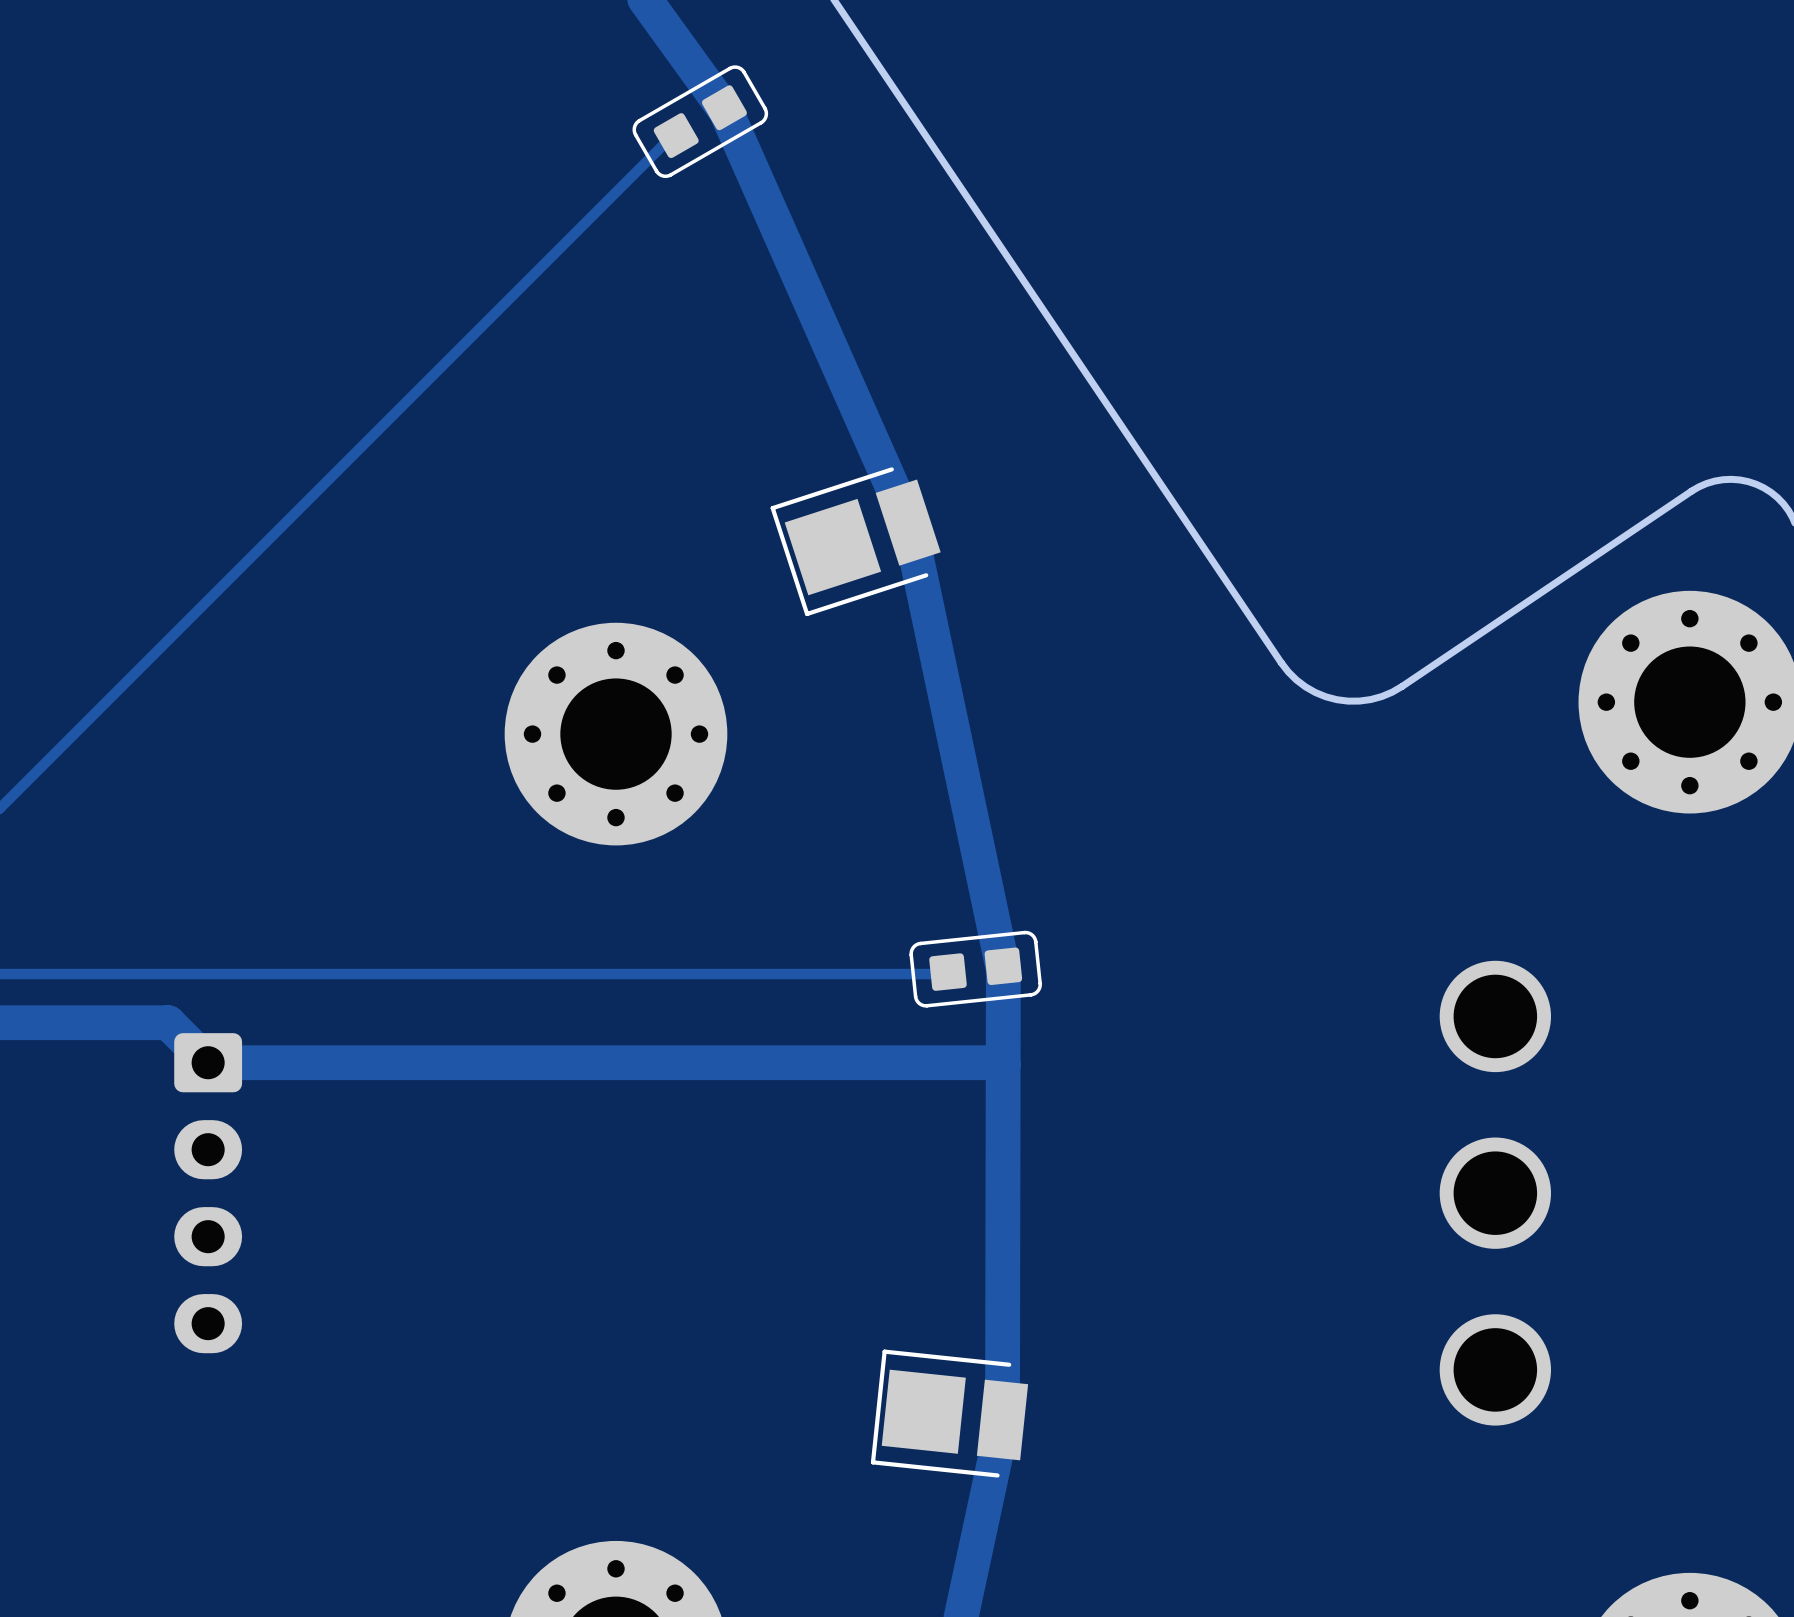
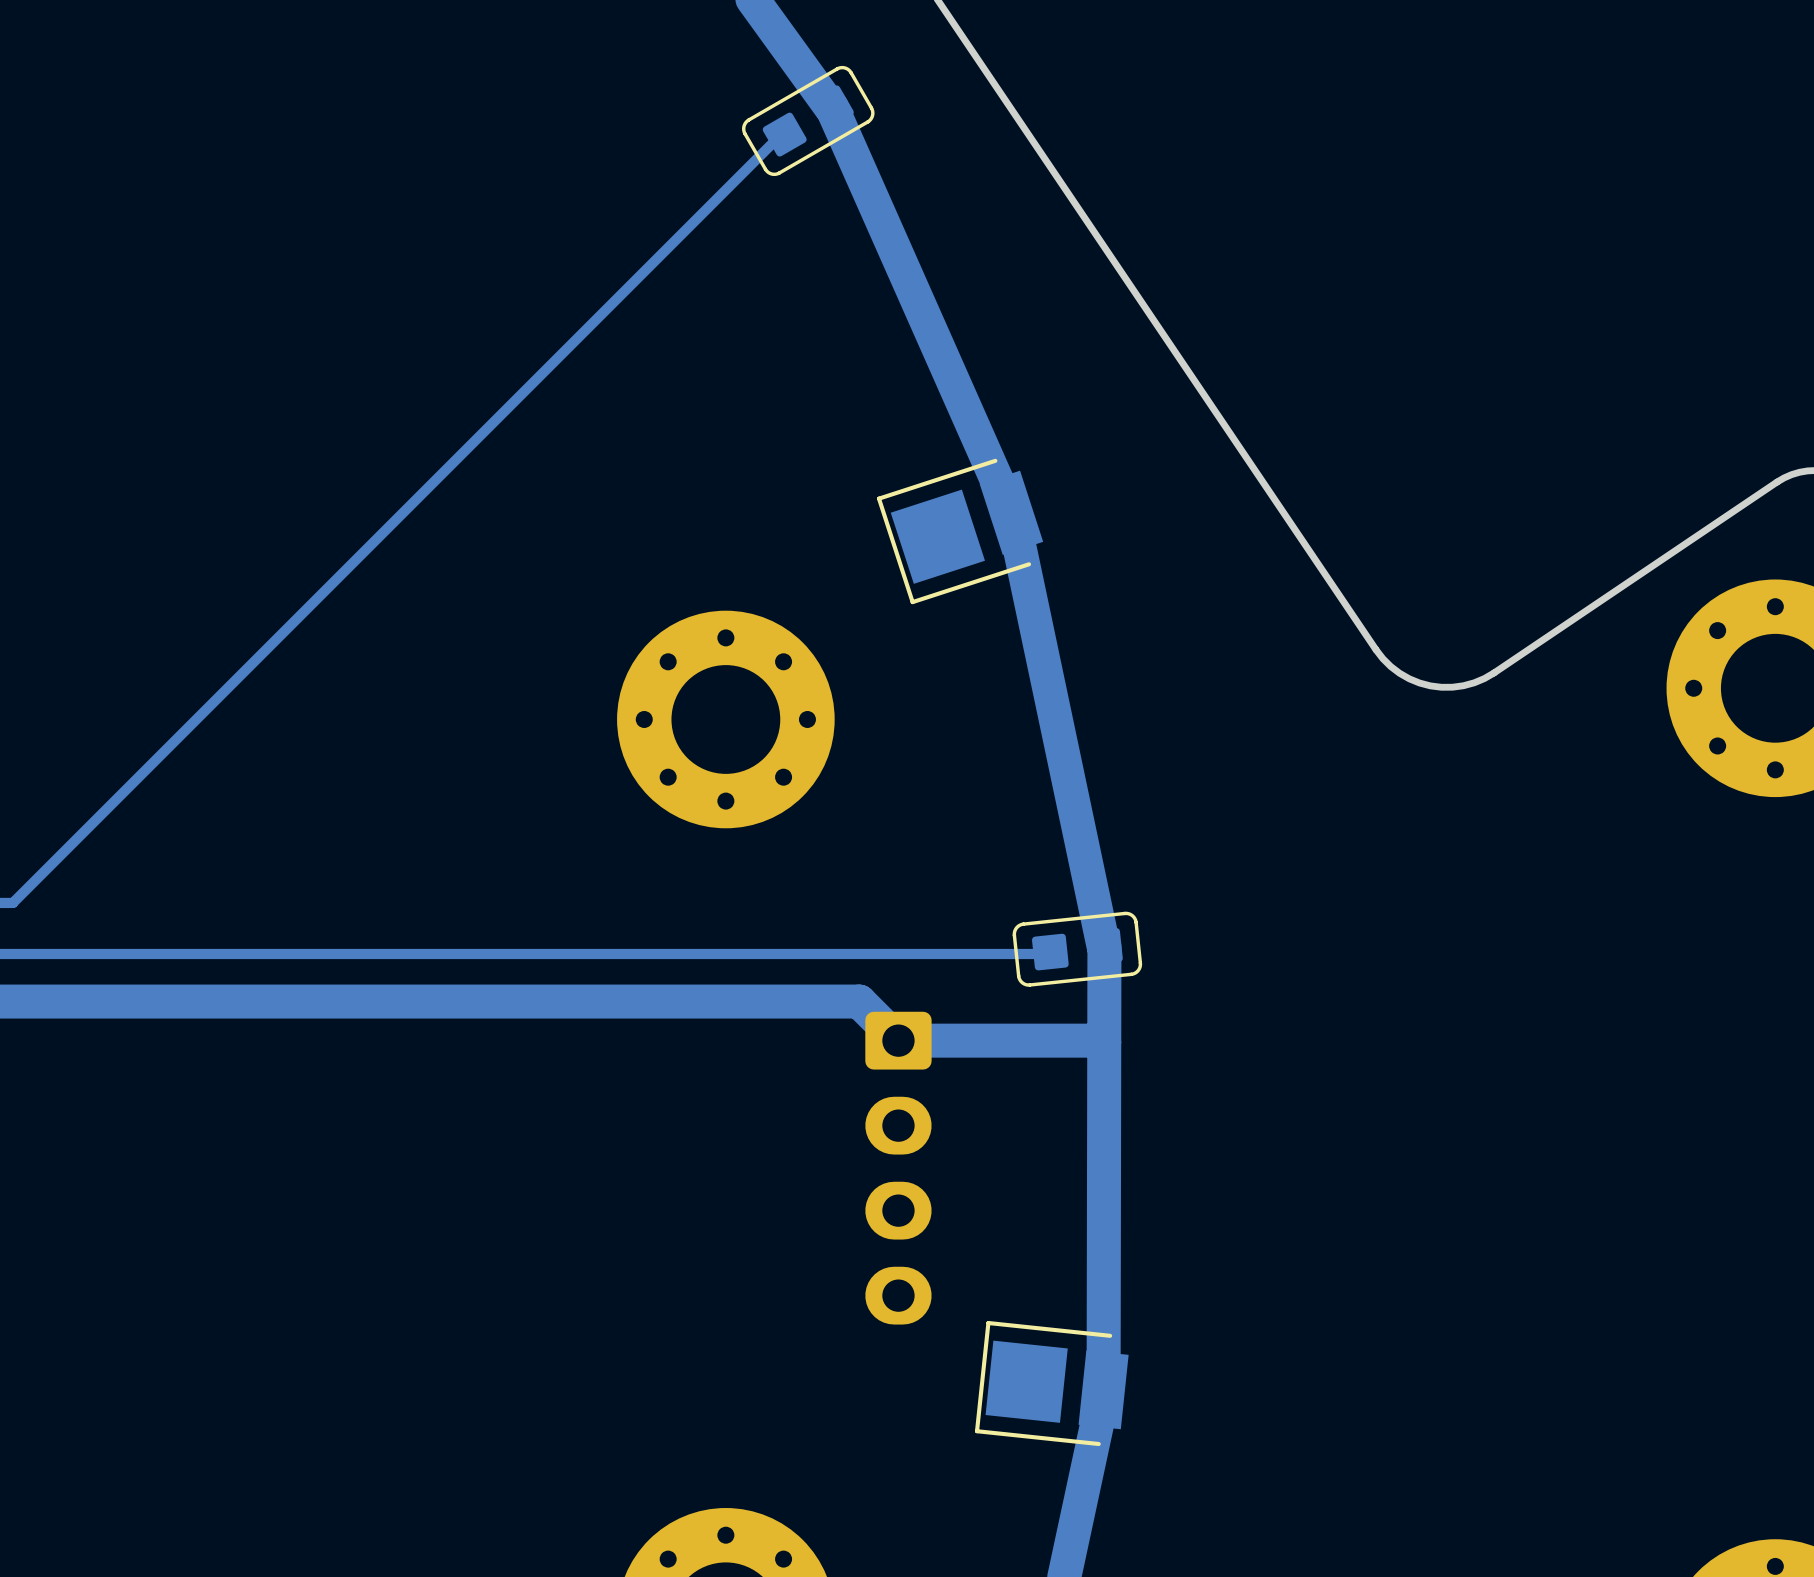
part: (1495, 1016) -> none
track: (168, 1022) (208, 1062) (792, 1062) -> (288, 1001) (859, 1001) (898, 1040)
part position: (208, 1193) -> (898, 1168)
part: (1495, 1193) -> none
part: (1495, 1369) -> none

